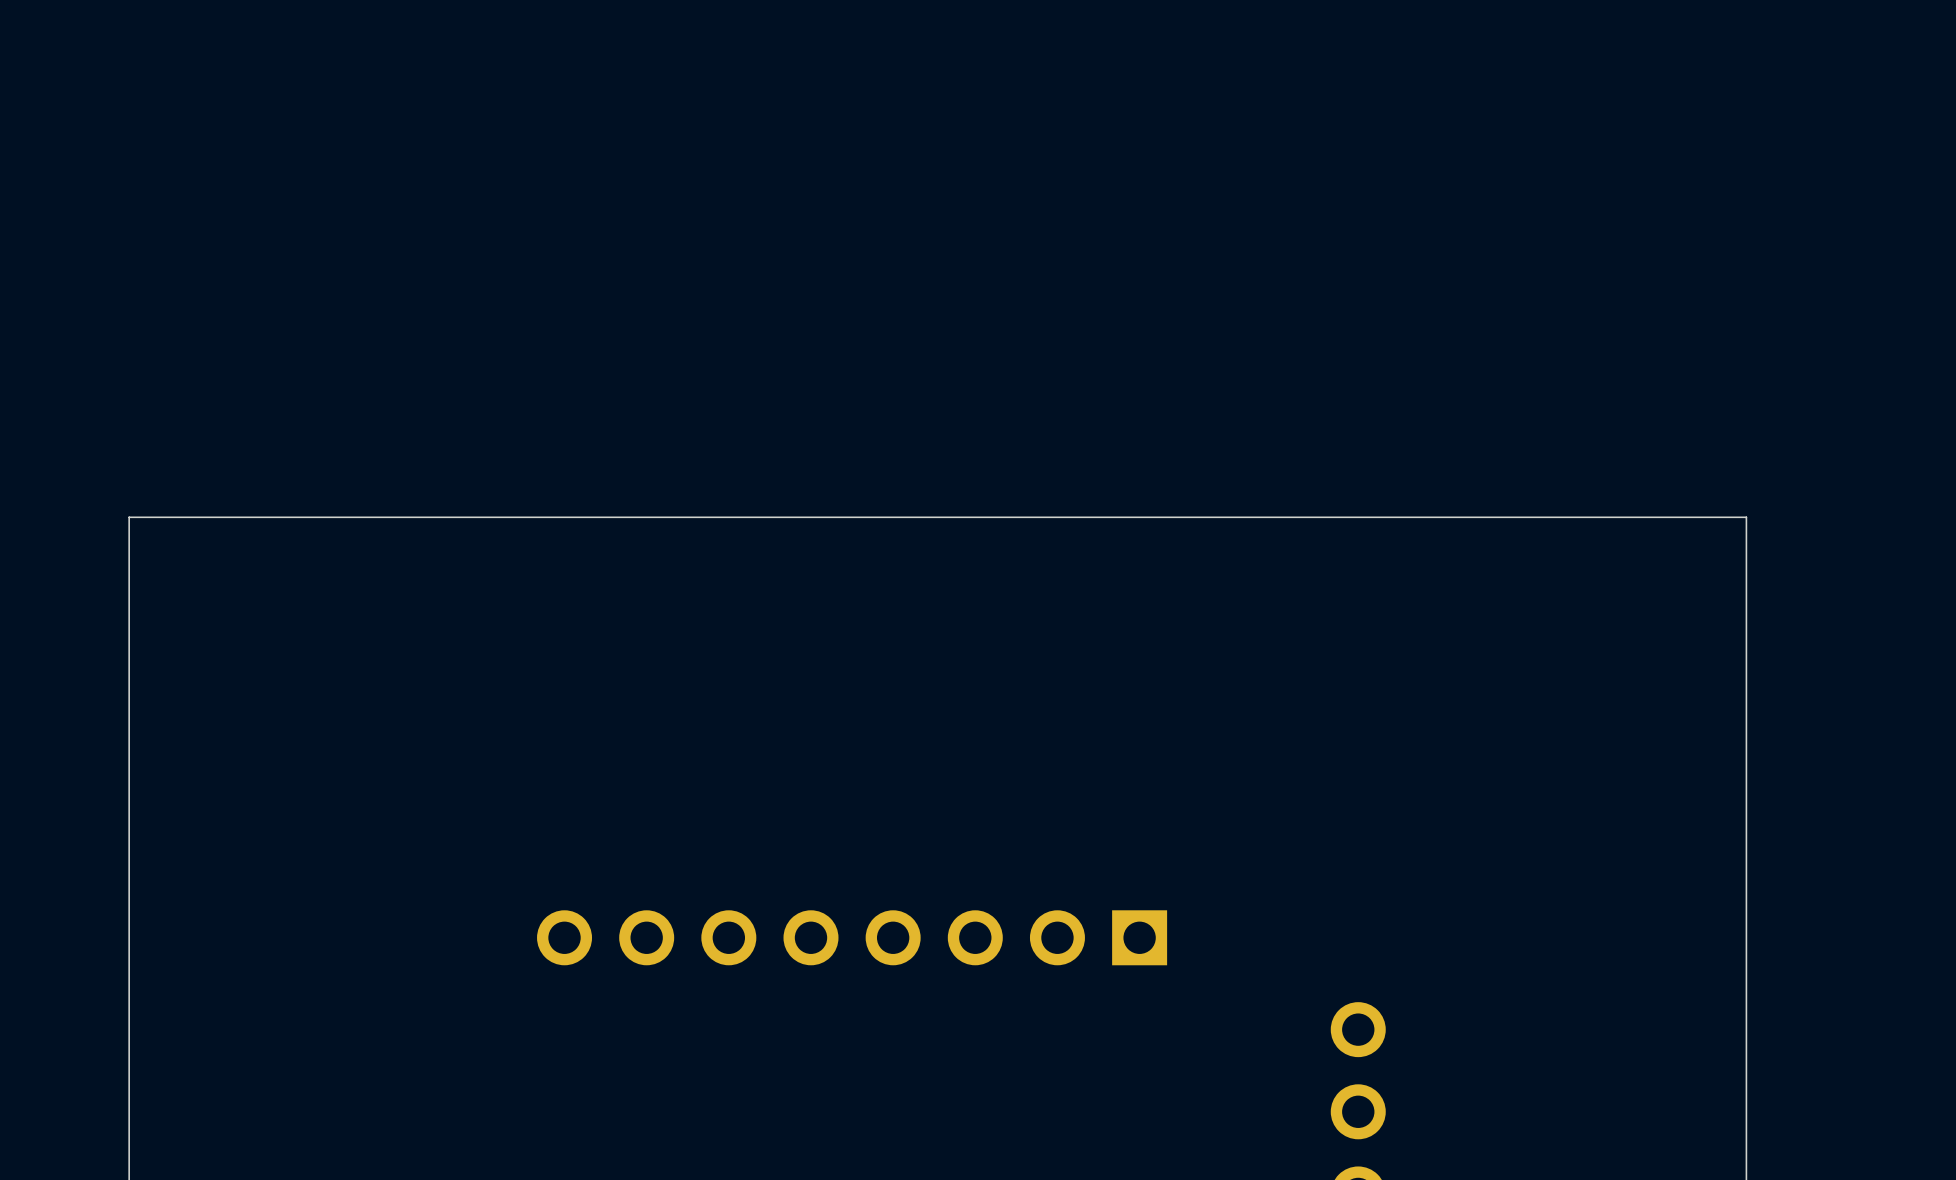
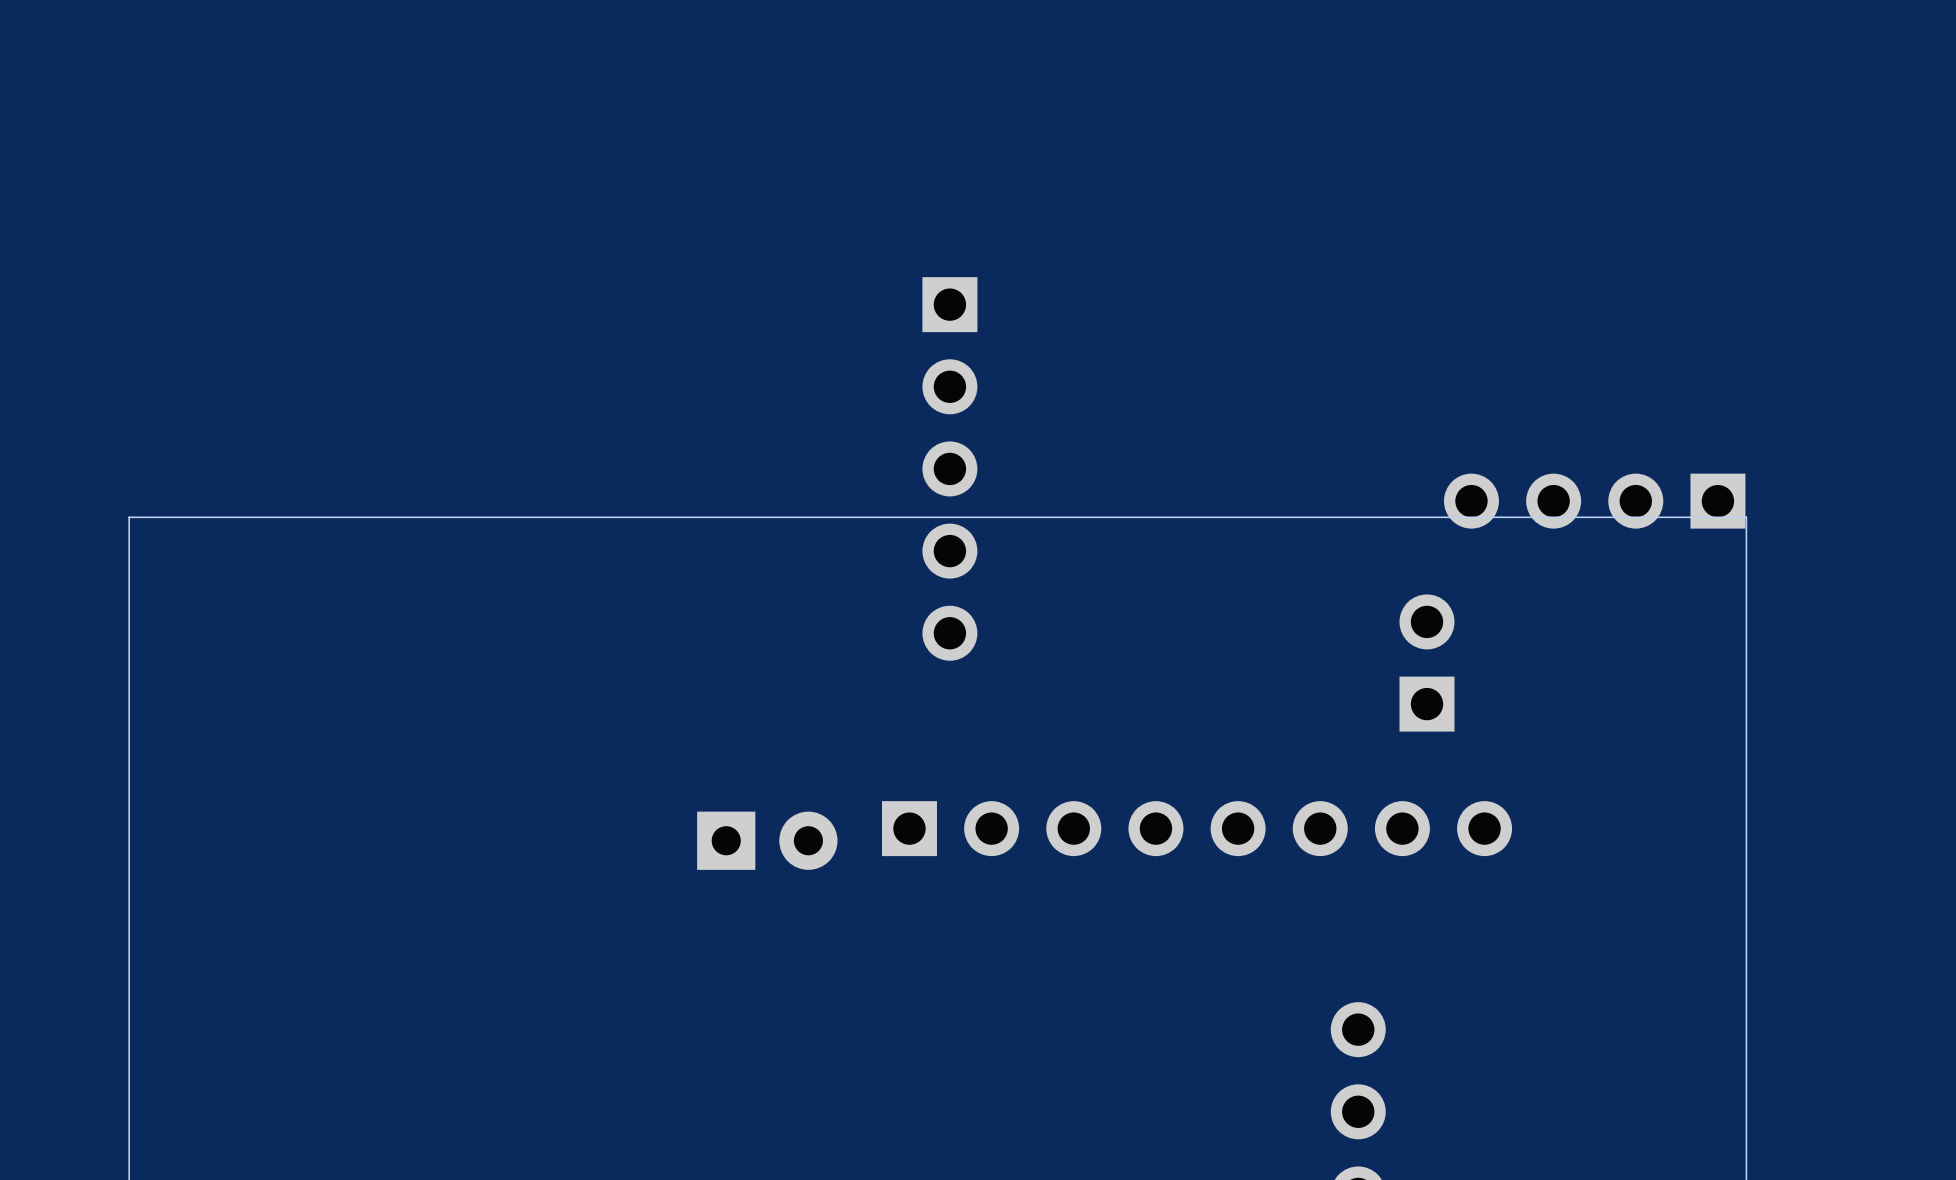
part: none -> (949, 468)
part: none -> (1594, 501)
part: none -> (1427, 663)
part: none -> (767, 840)
part rotation: 0° (852, 937) -> 180° (1197, 828)

